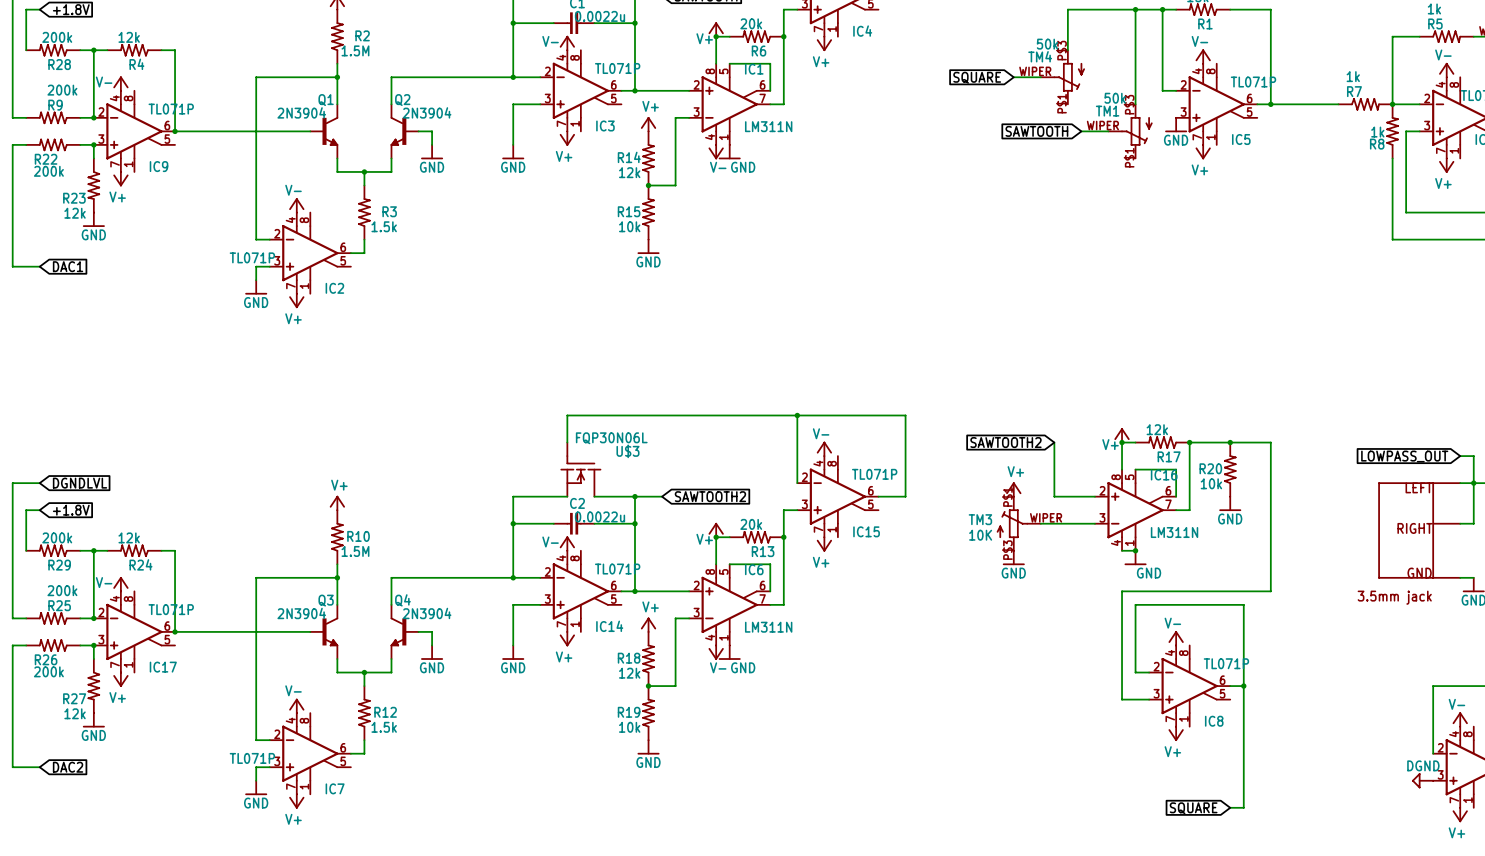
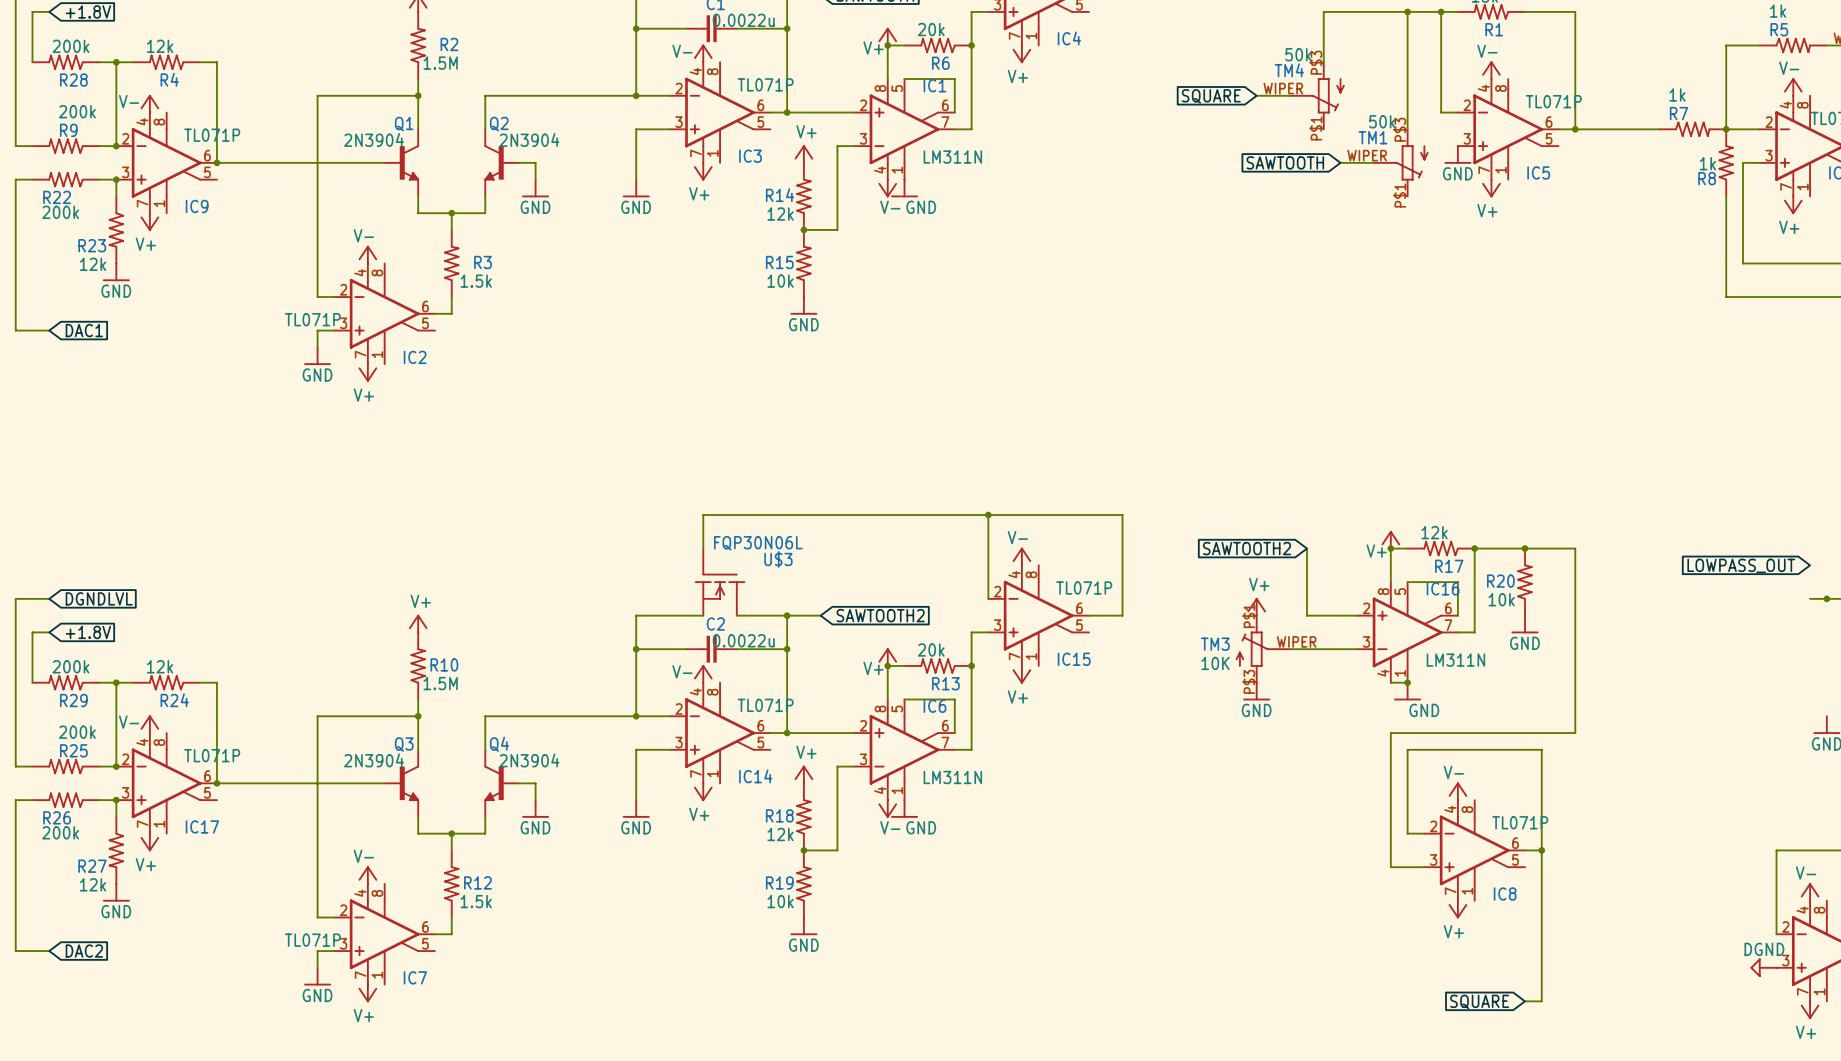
wire: (1460, 456) (1473, 456) (1473, 523) (1460, 523) -> none
part: (1419, 530) -> none
wire: (1460, 577) (1473, 577) -> none
text: 3.5mm jack (1394, 597) -> none

